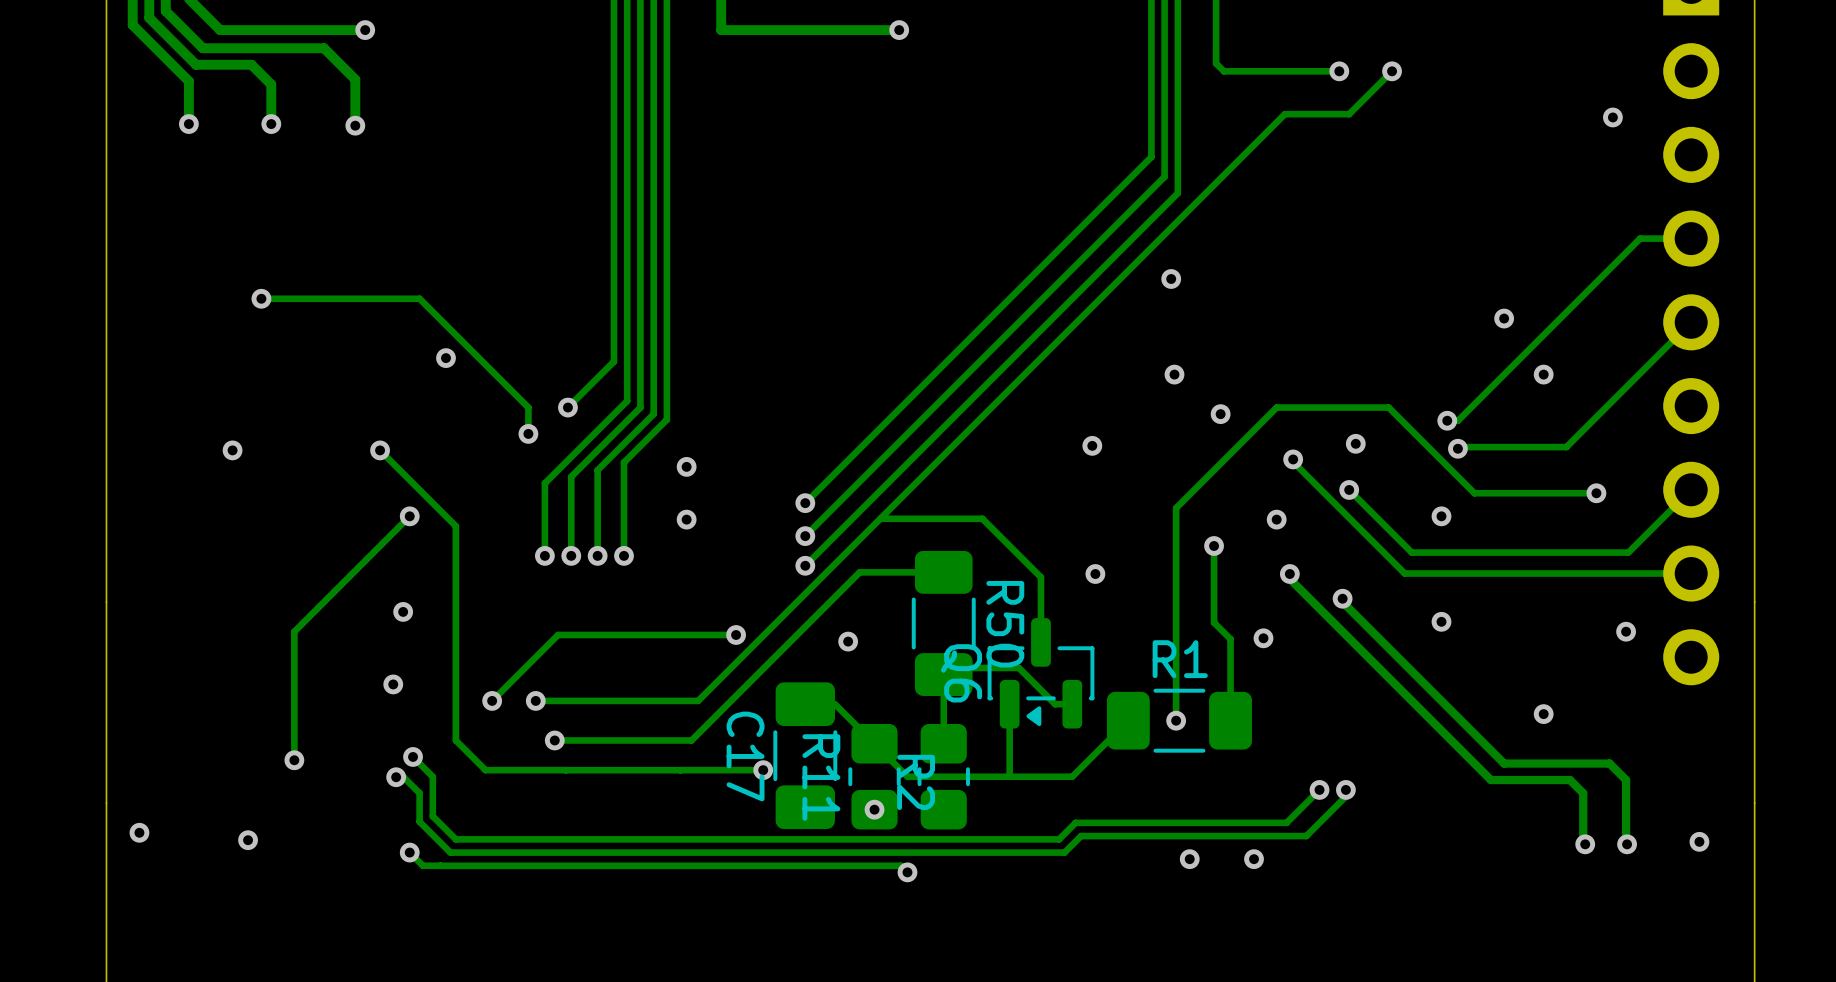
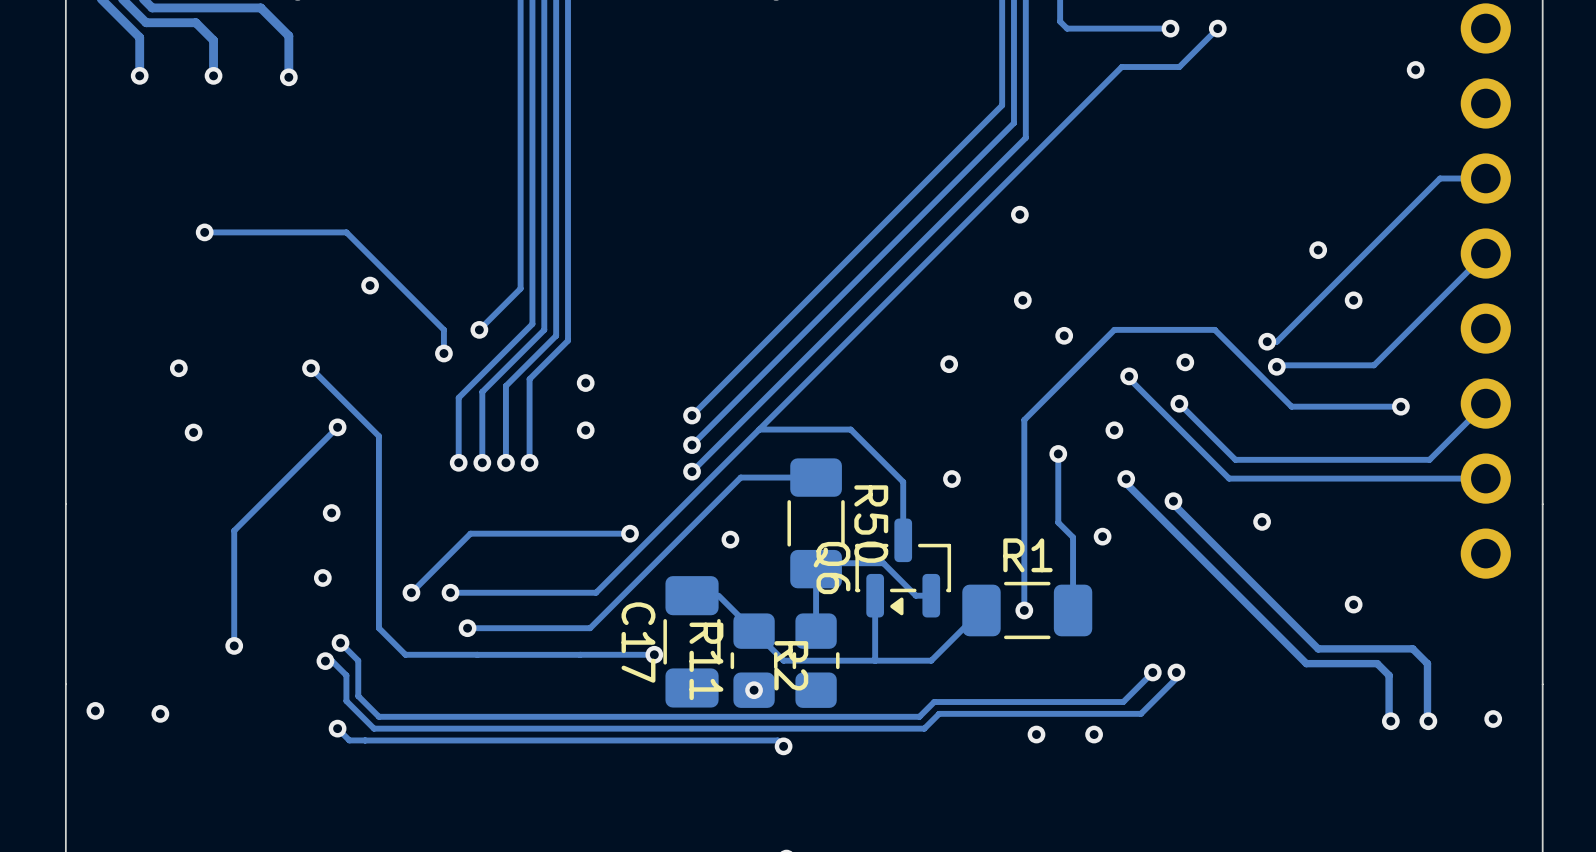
via: (1441, 516) -> none
via: none -> (193, 432)
via: (1626, 631) -> none
via position: (248, 840) -> (160, 713)

